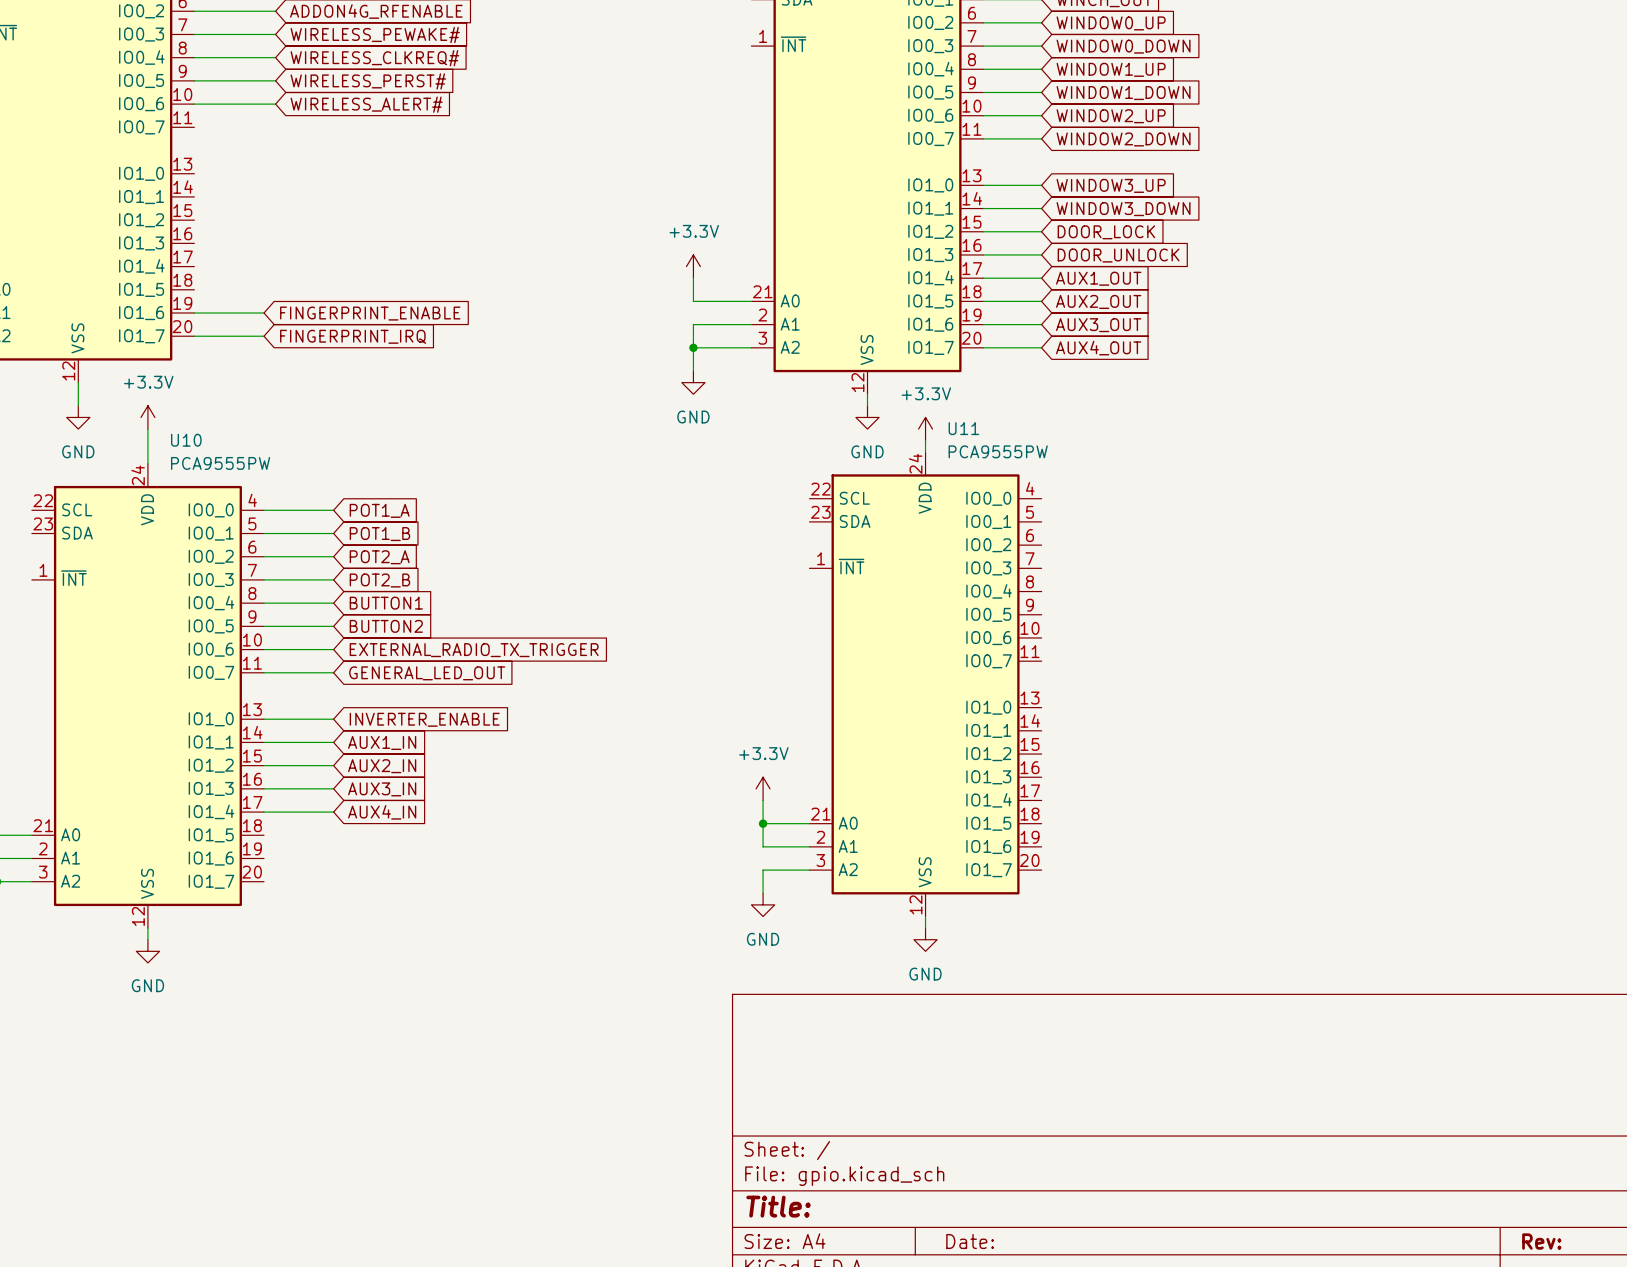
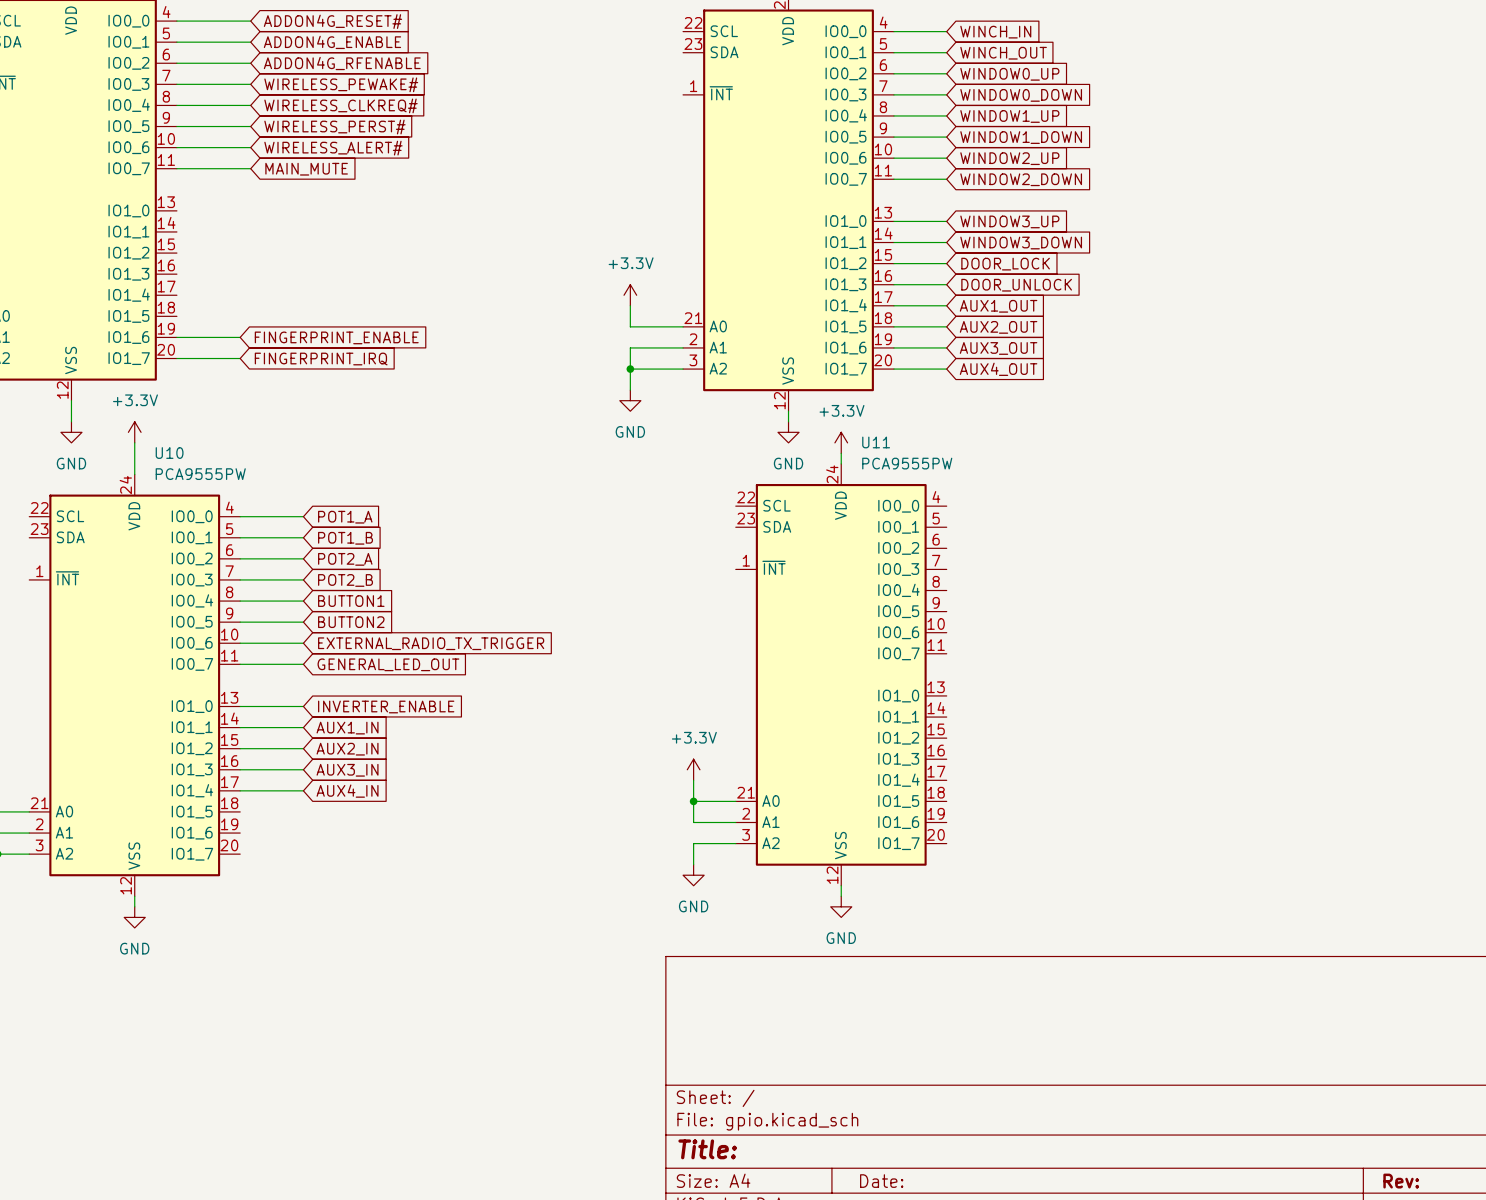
wire: none -> (176, 168) (250, 168)
global label: none -> MAIN_MUTE (306, 169)

